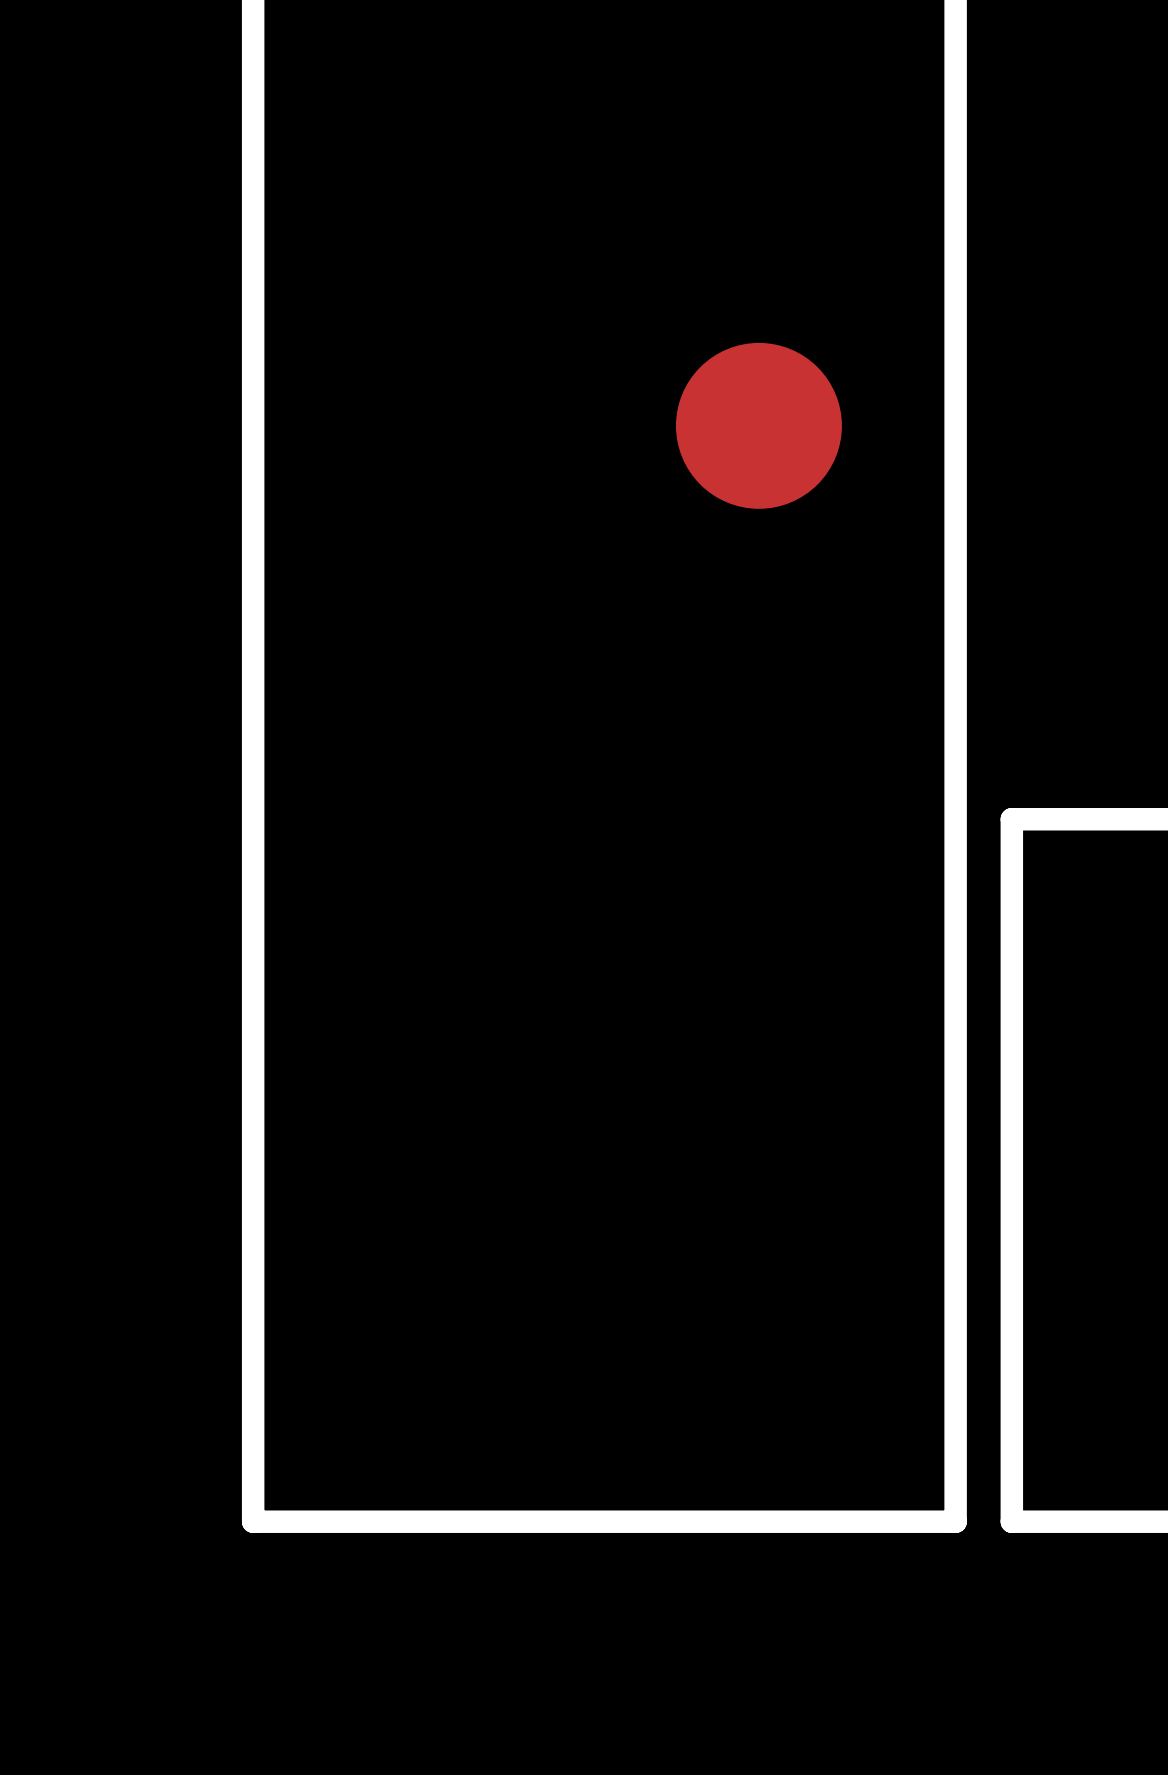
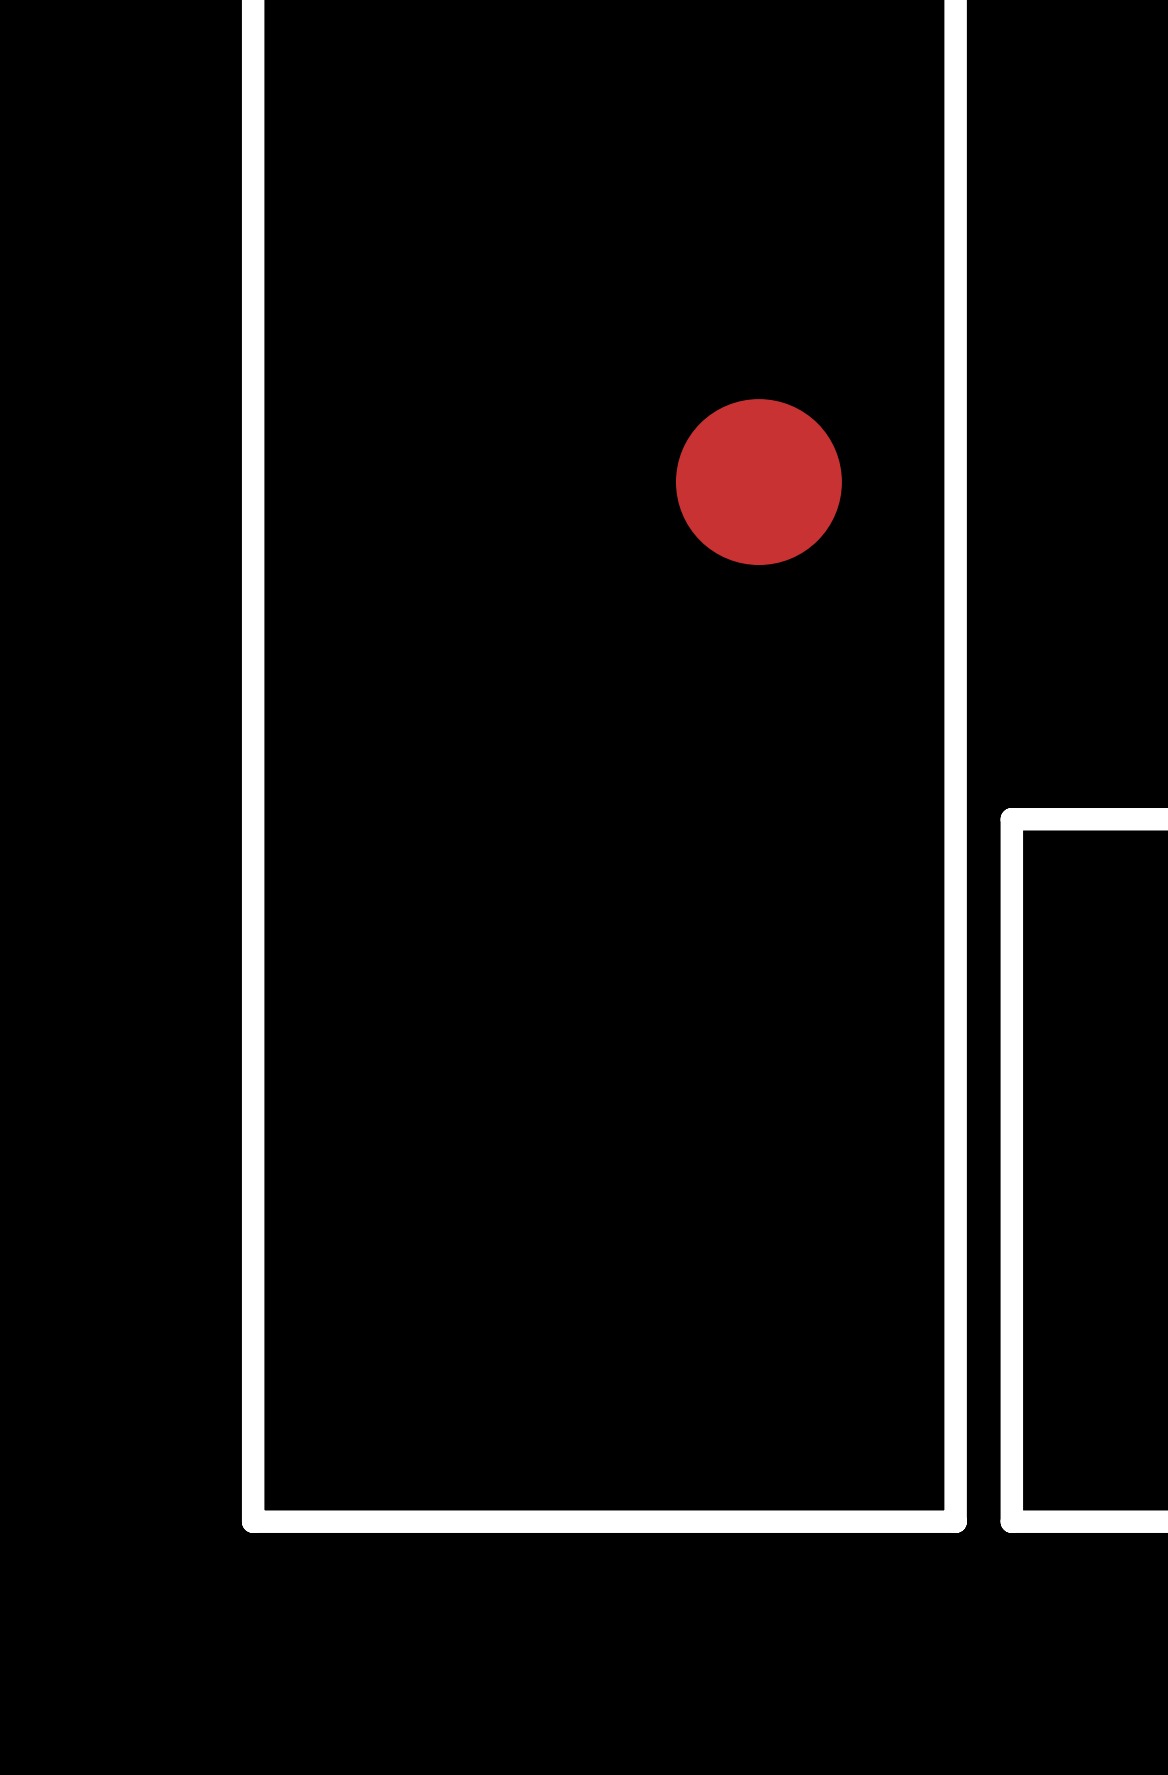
part position: (758, 425) -> (758, 482)

